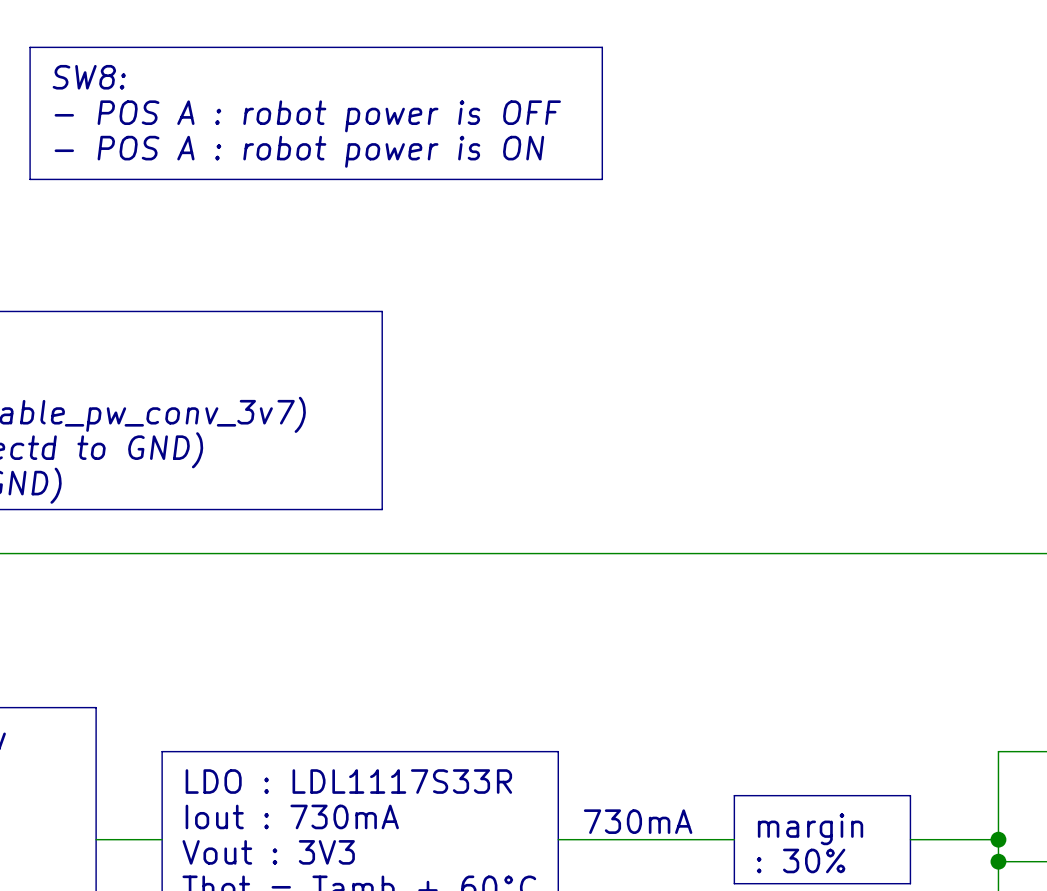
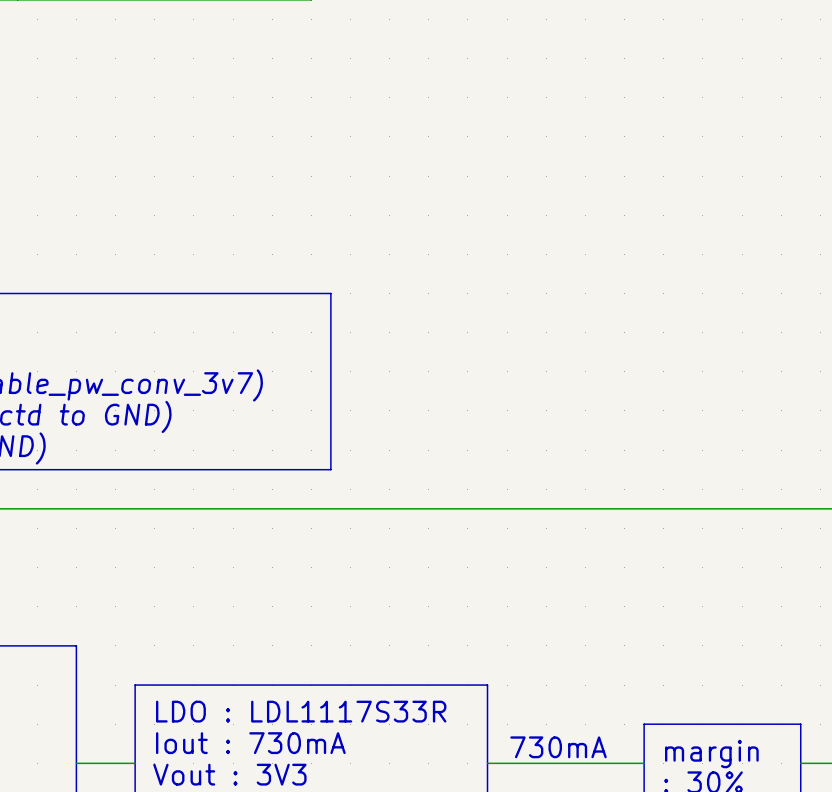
line: (30, 47) (602, 47) (602, 179) (30, 179) (30, 47) -> none
text: SW8: (89, 77) -> none
text: - POS A : robot power is OFF (307, 116) -> none
text: - POS A : robot power is ON (299, 151) -> none

